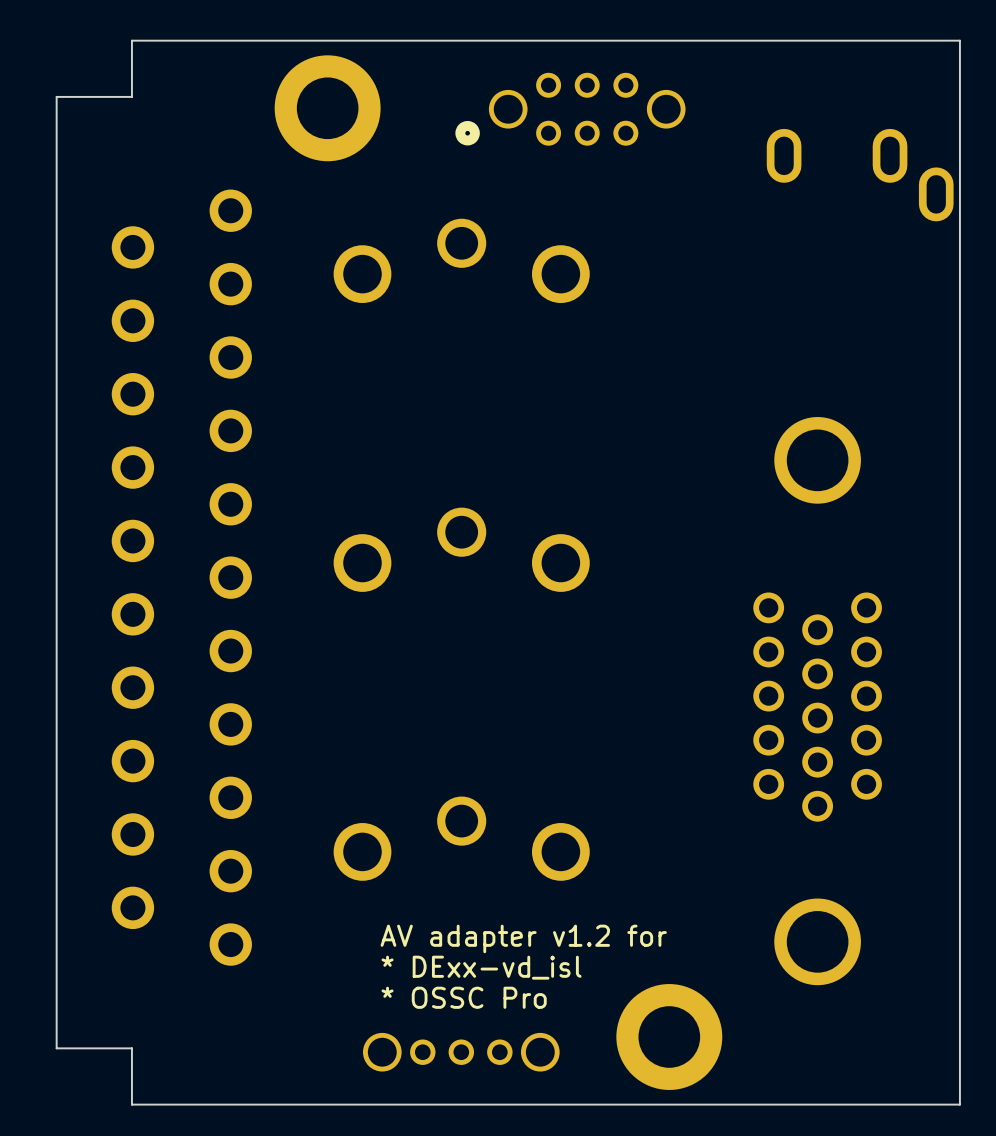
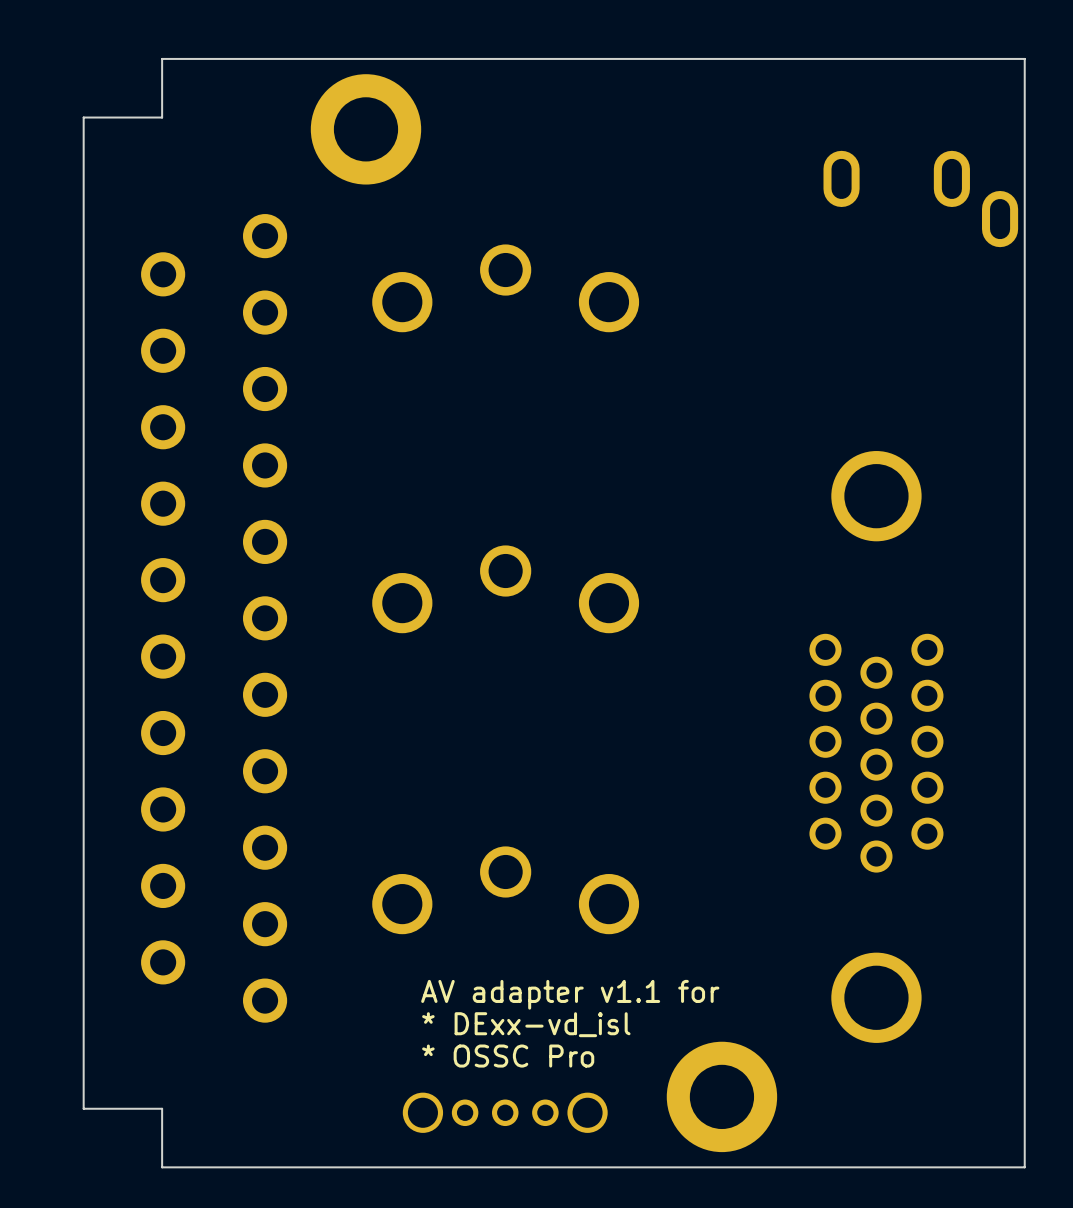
part: (570, 109) -> none
text: AV adapter v1.2 for (523, 938) -> AV adapter v1.1 for (570, 994)

